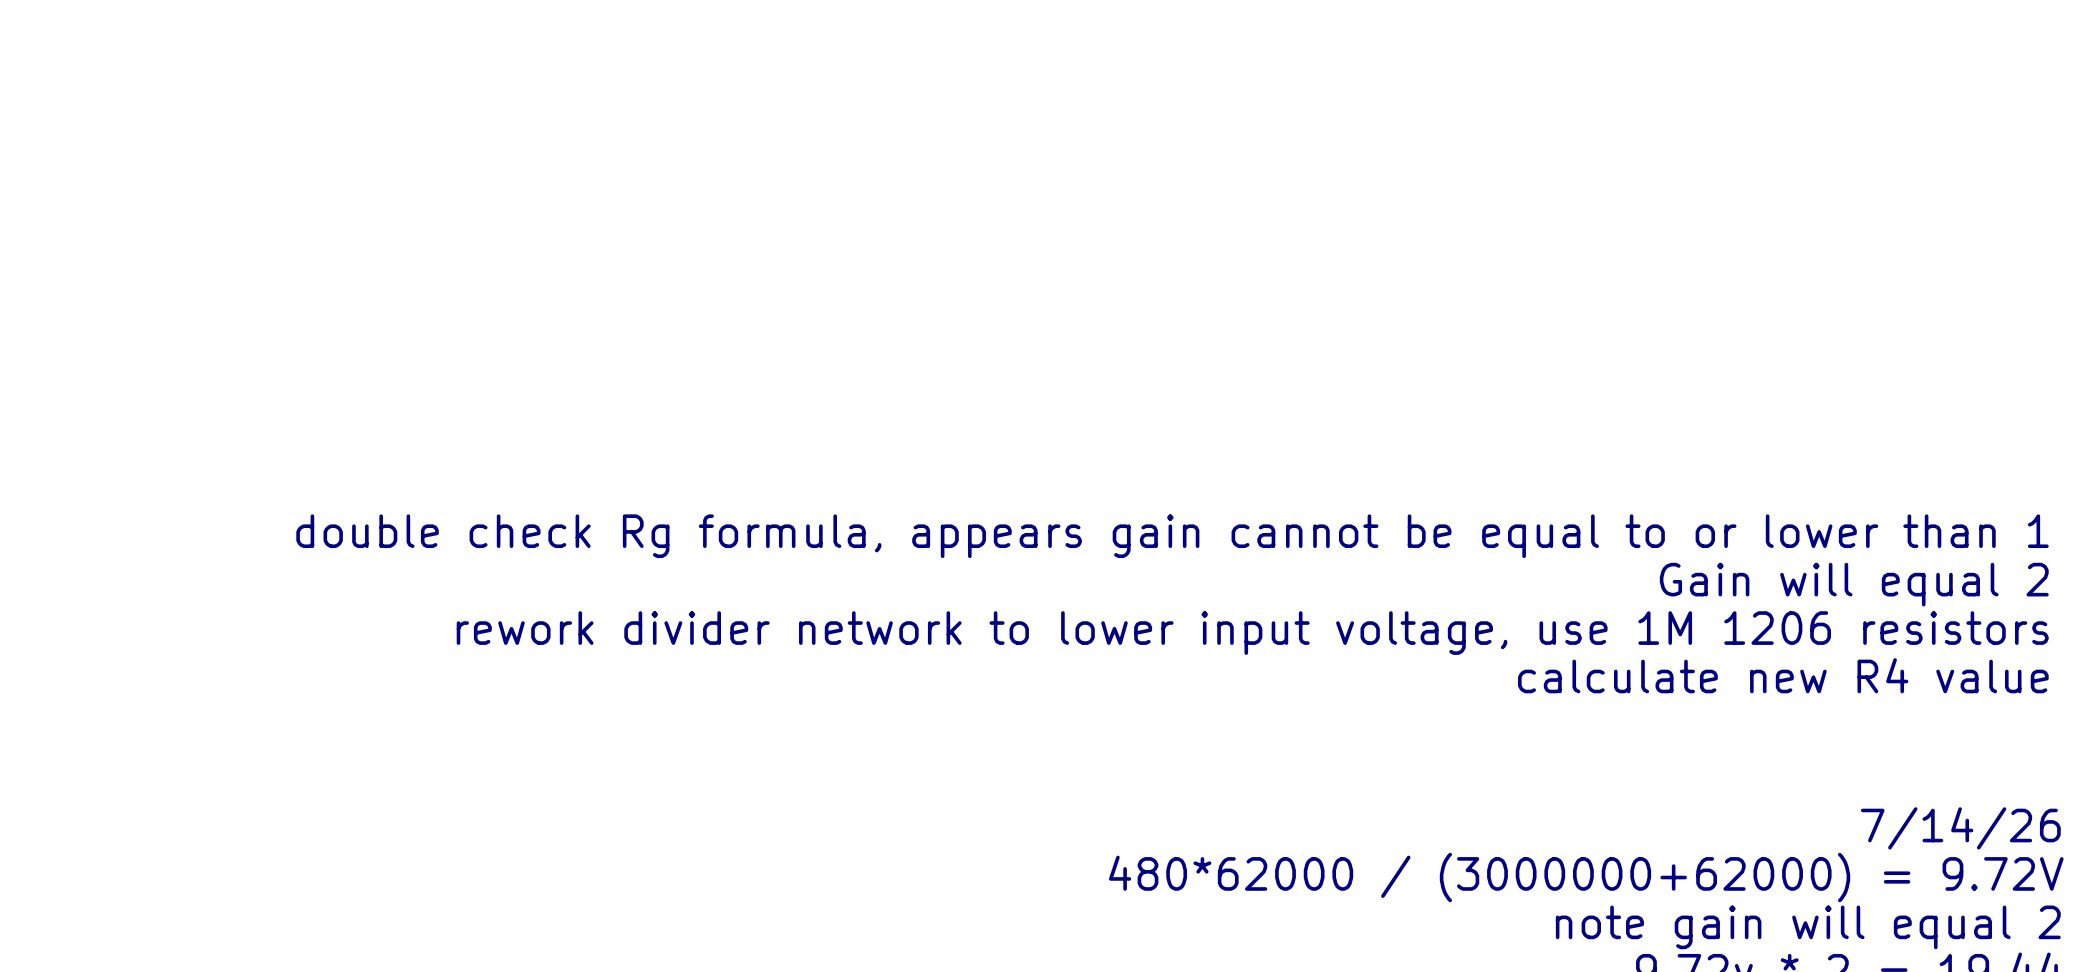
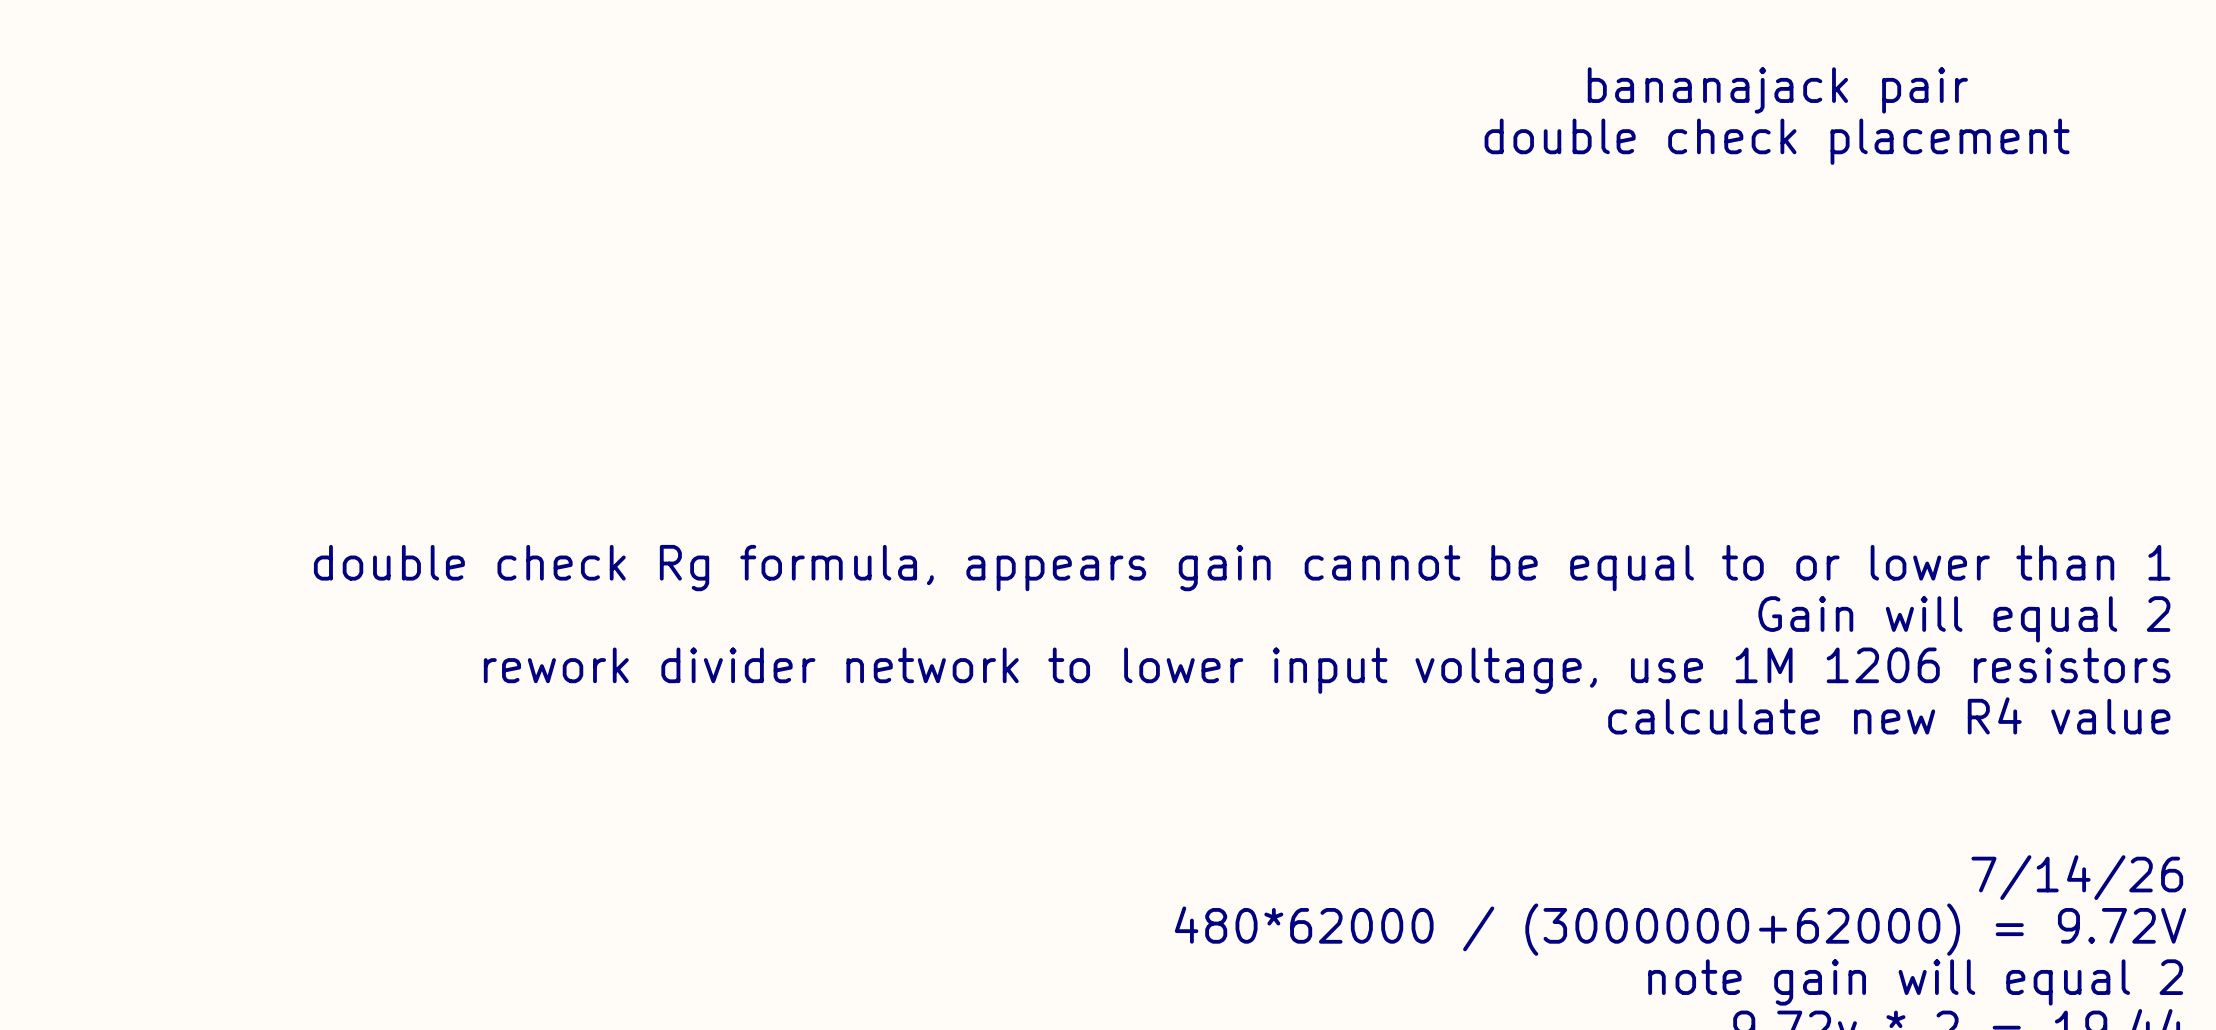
text: none -> bananajack pair (1777, 90)
text: none -> double check placement (1777, 141)

